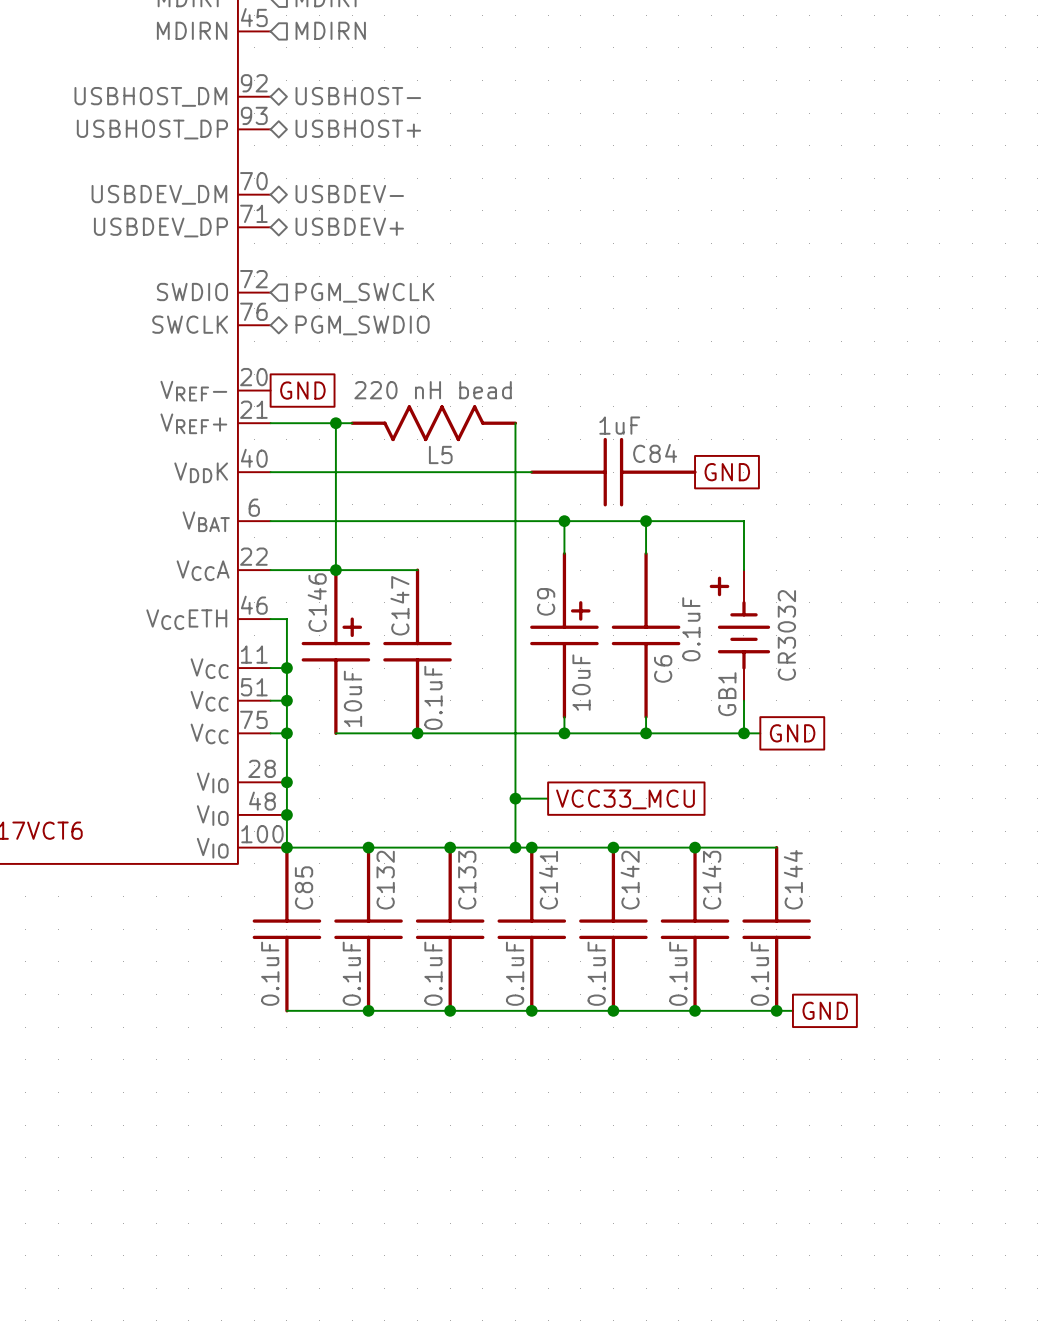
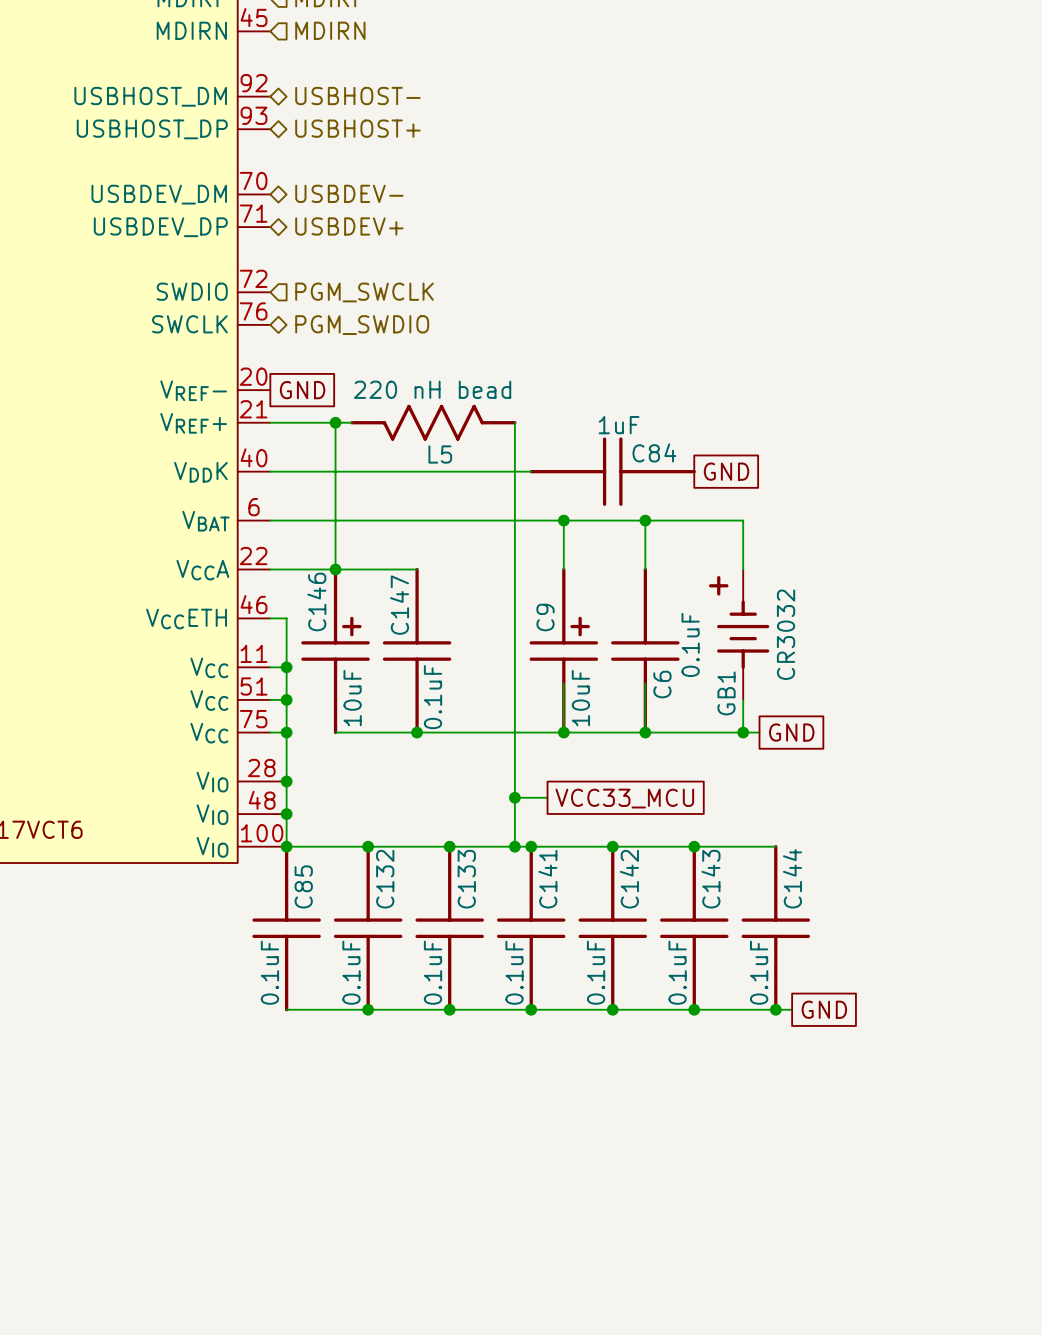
C9 symbol: [530, 552, 599, 719] -> [529, 567, 599, 735]
C6 symbol: [611, 552, 681, 719] -> [611, 567, 680, 735]

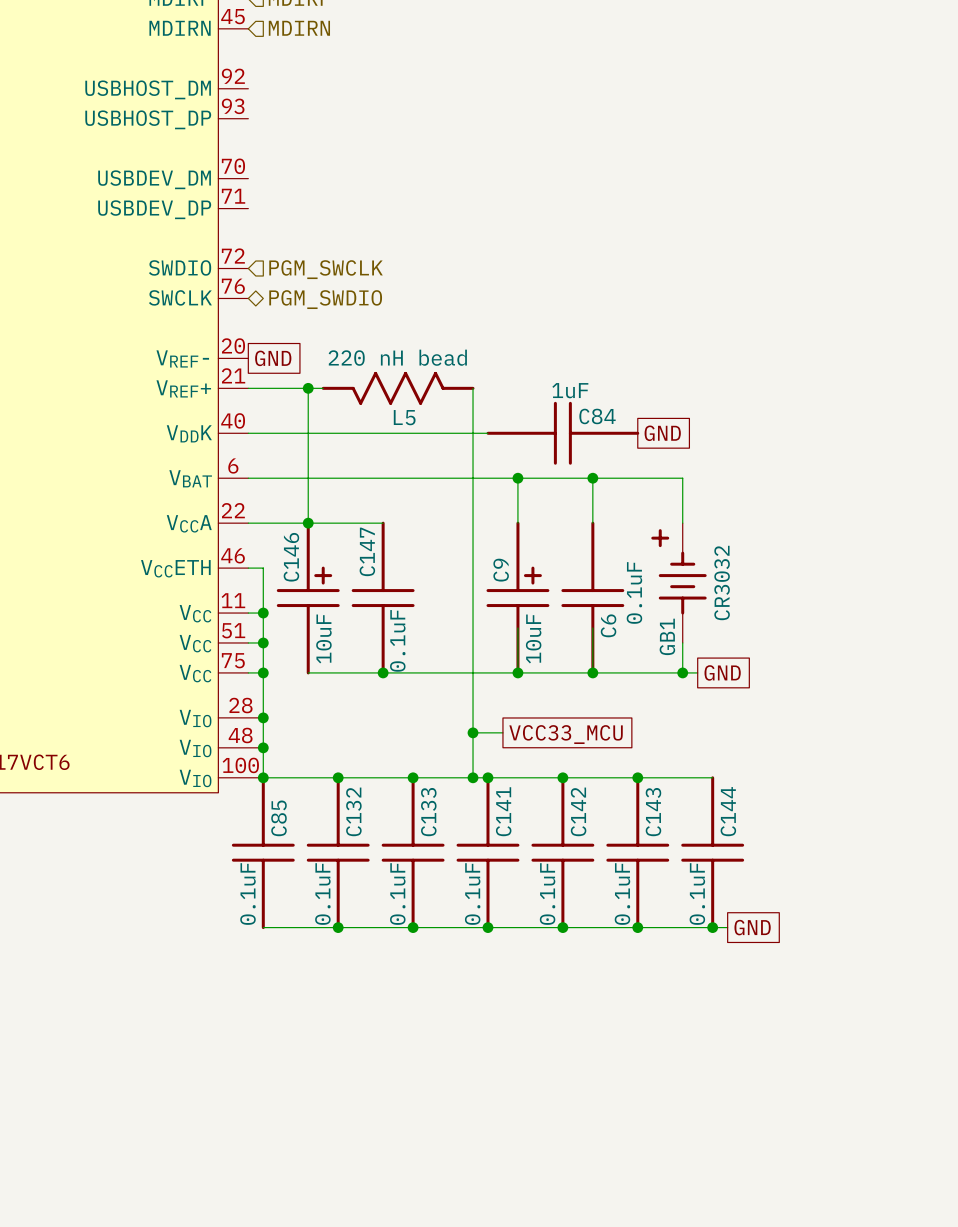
hierarchical label: USBHOST- (357, 96) -> none
hierarchical label: USBHOST+ (357, 128) -> none
hierarchical label: USBDEV- (349, 193) -> none
hierarchical label: USBDEV+ (349, 226) -> none

